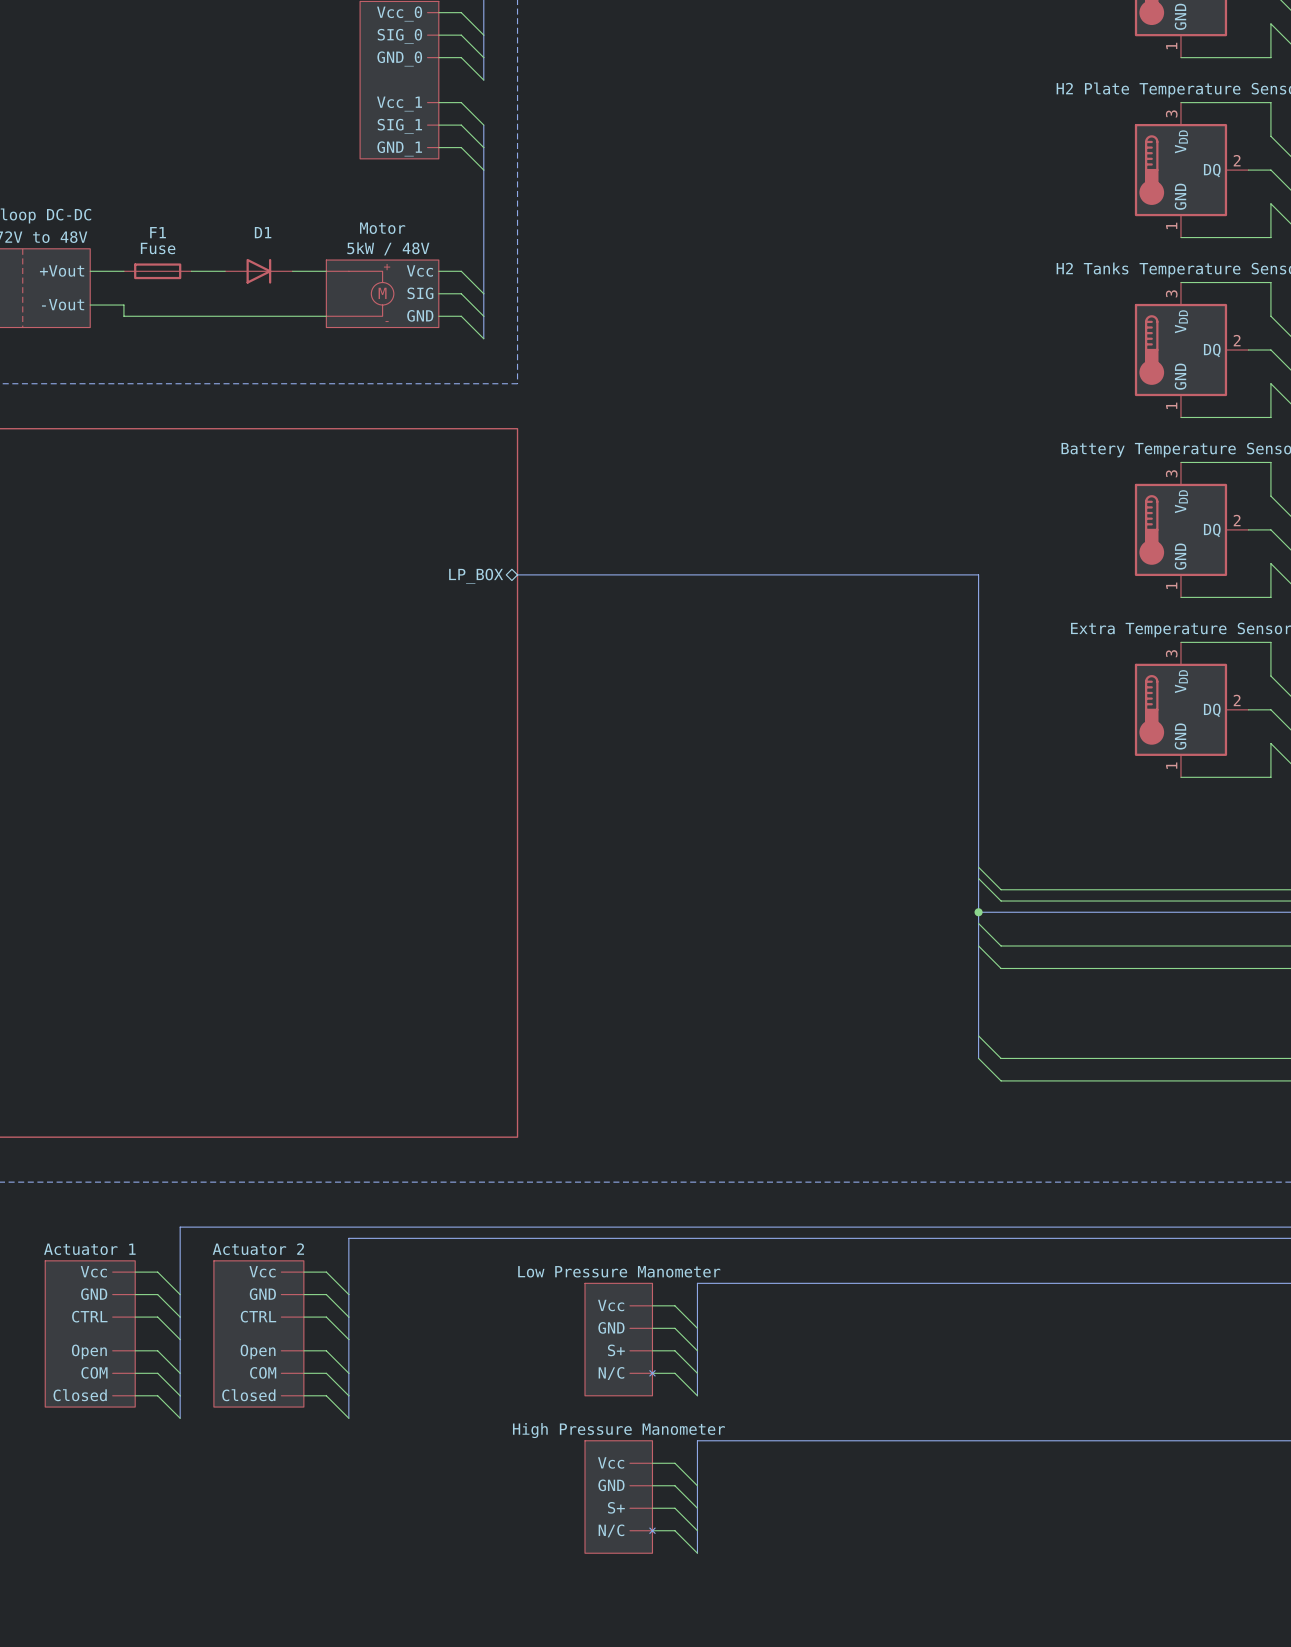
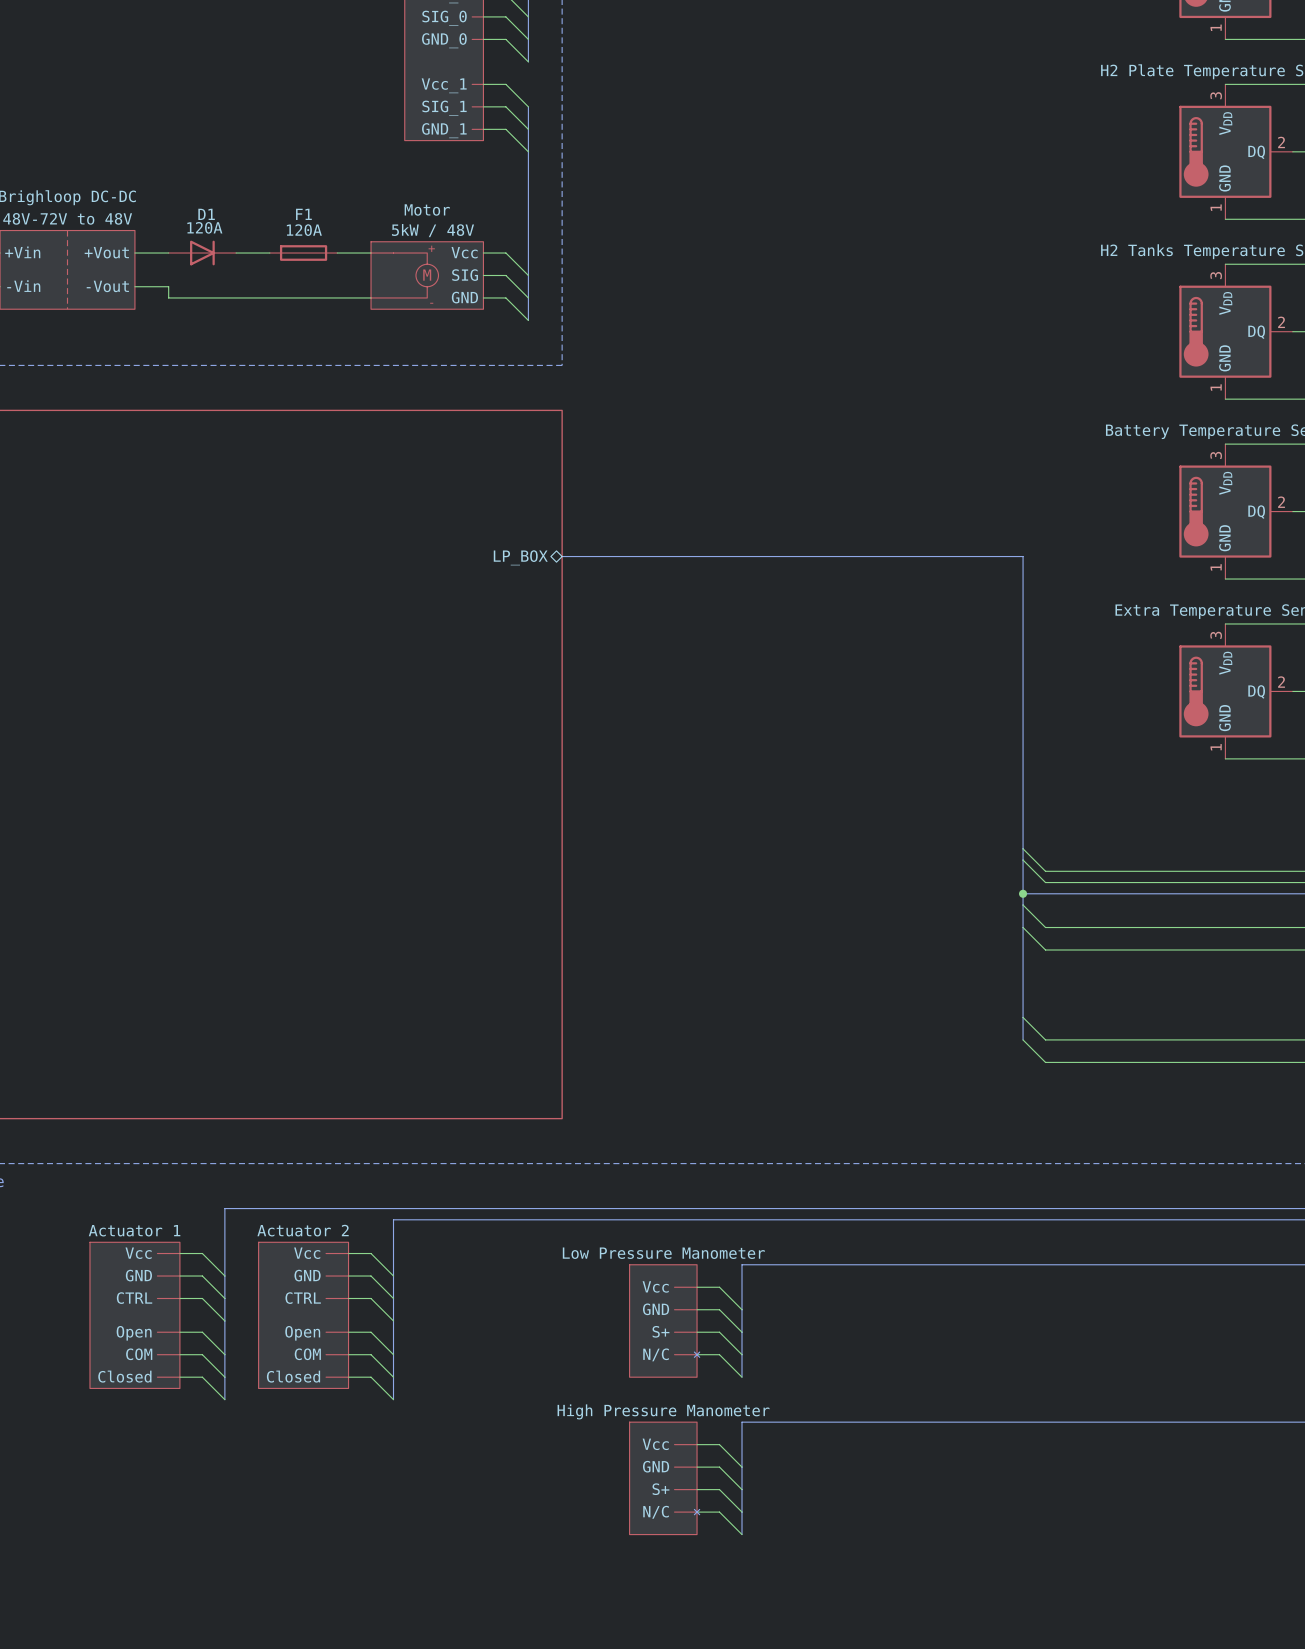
D1 value: none -> 120A (204, 227)
F1 value: Fuse (158, 248) -> 120A (304, 230)
F1 position: (157, 271) -> (303, 253)
D1 position: (258, 271) -> (202, 253)

